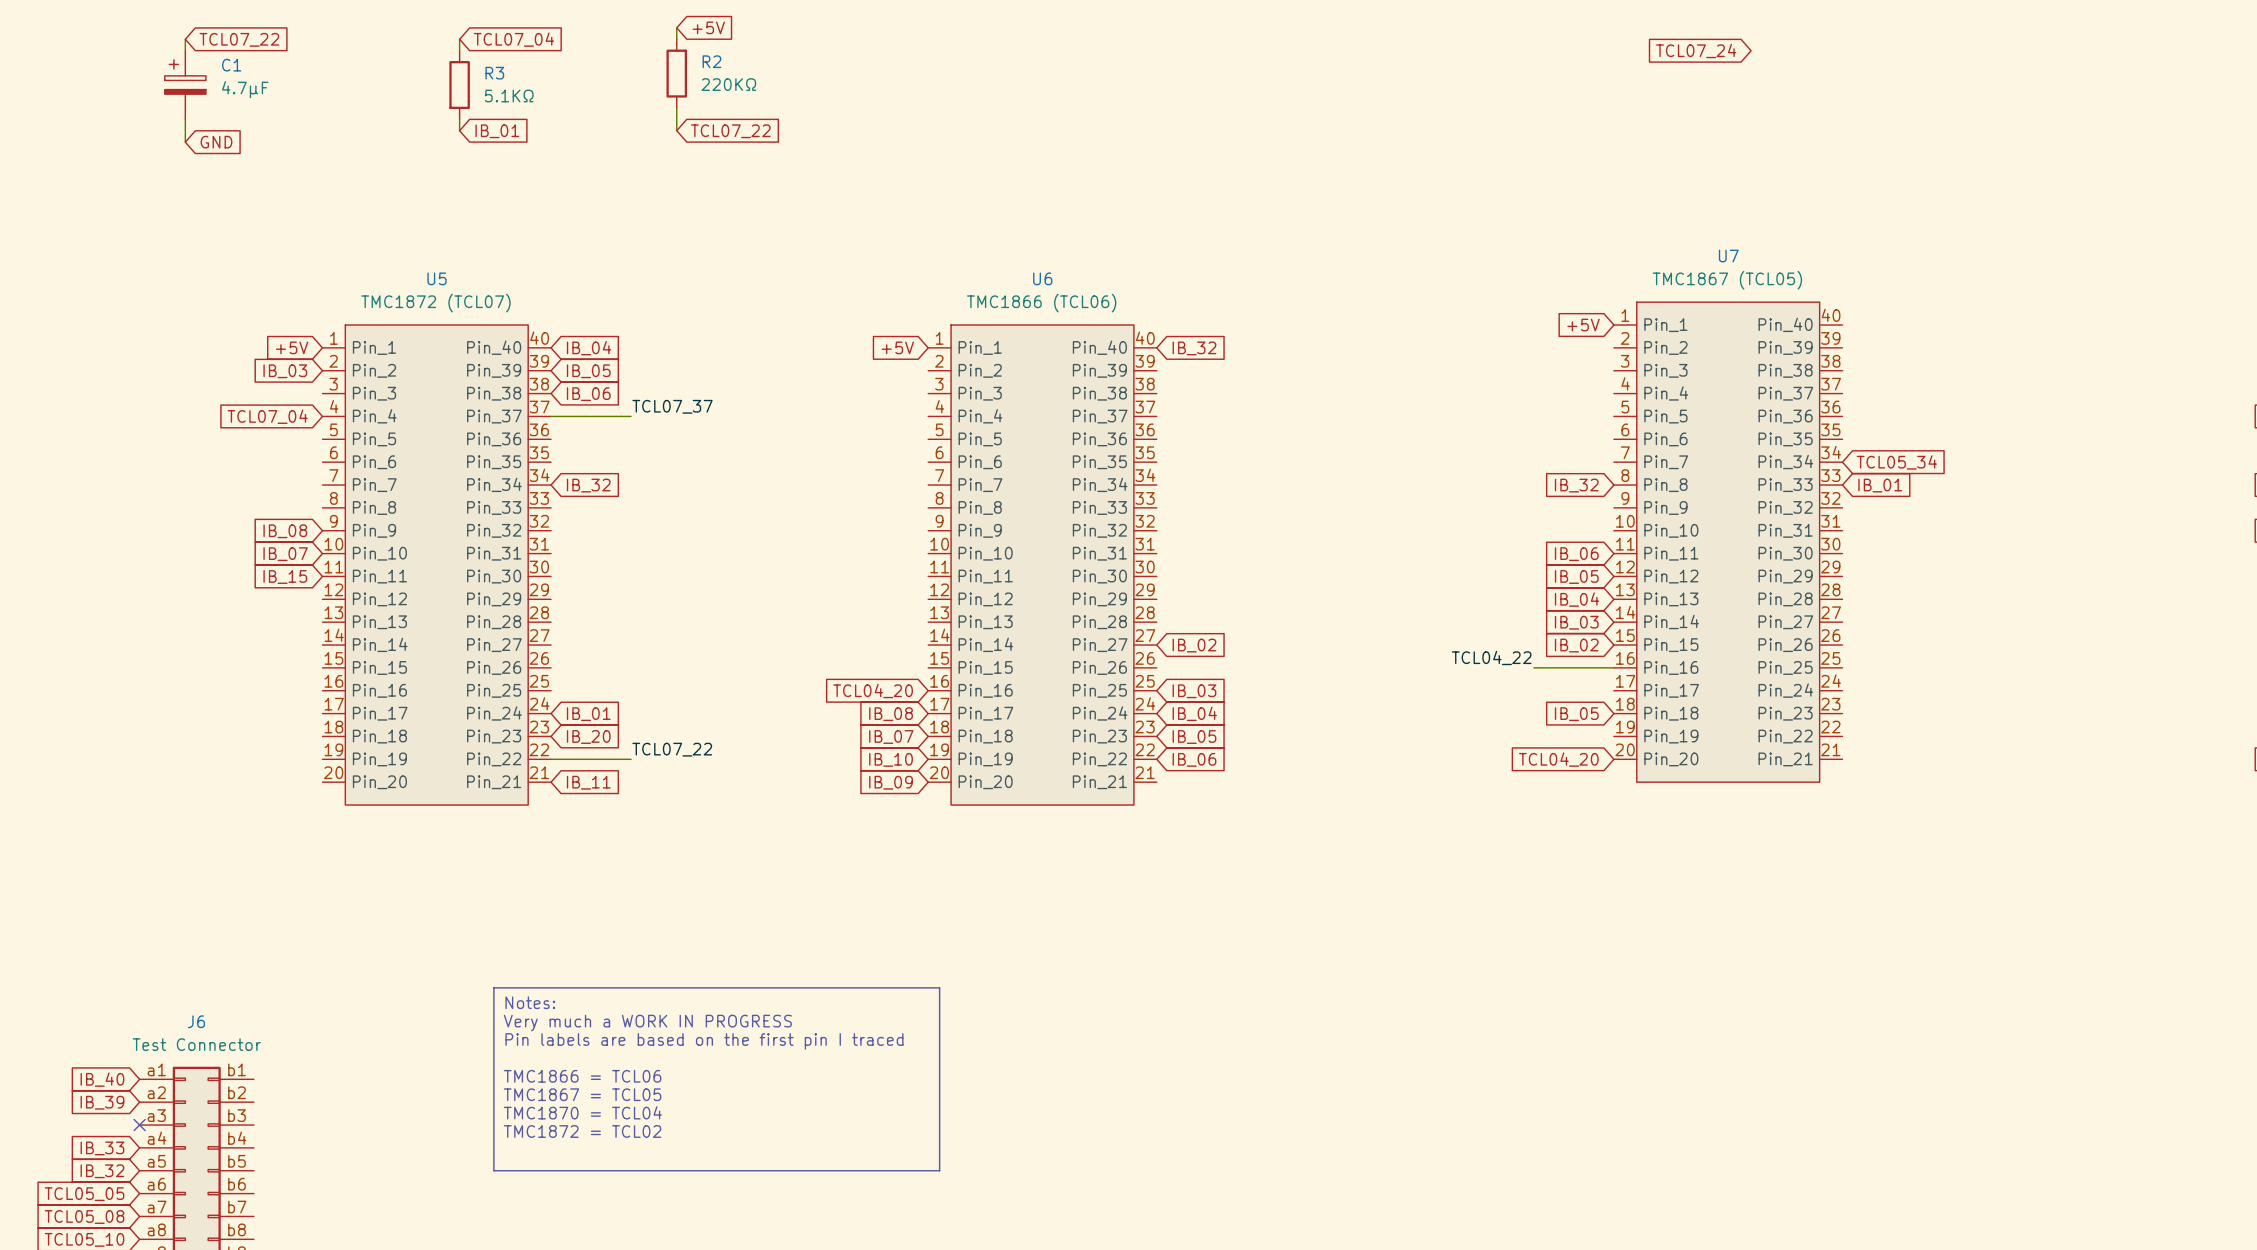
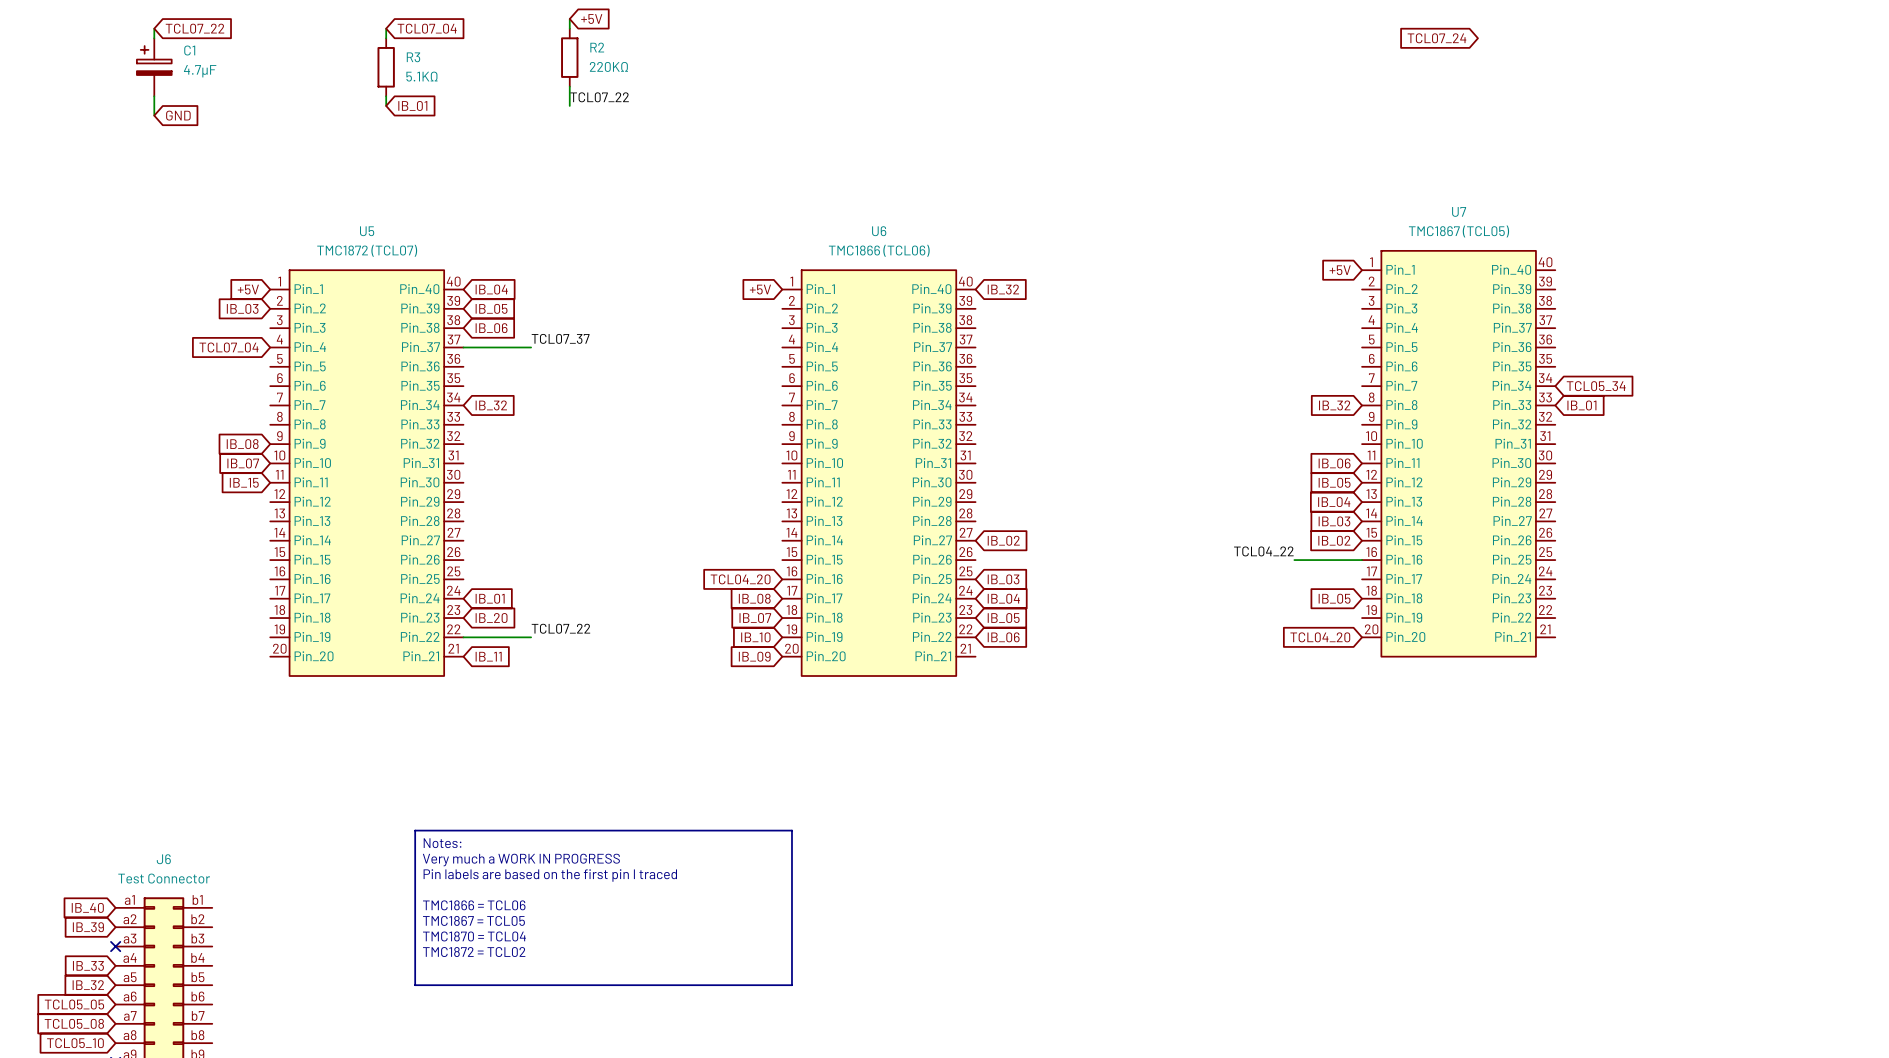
label: none -> TCL07_22 (599, 97)
global label: TCL07_22 (730, 131) -> none

